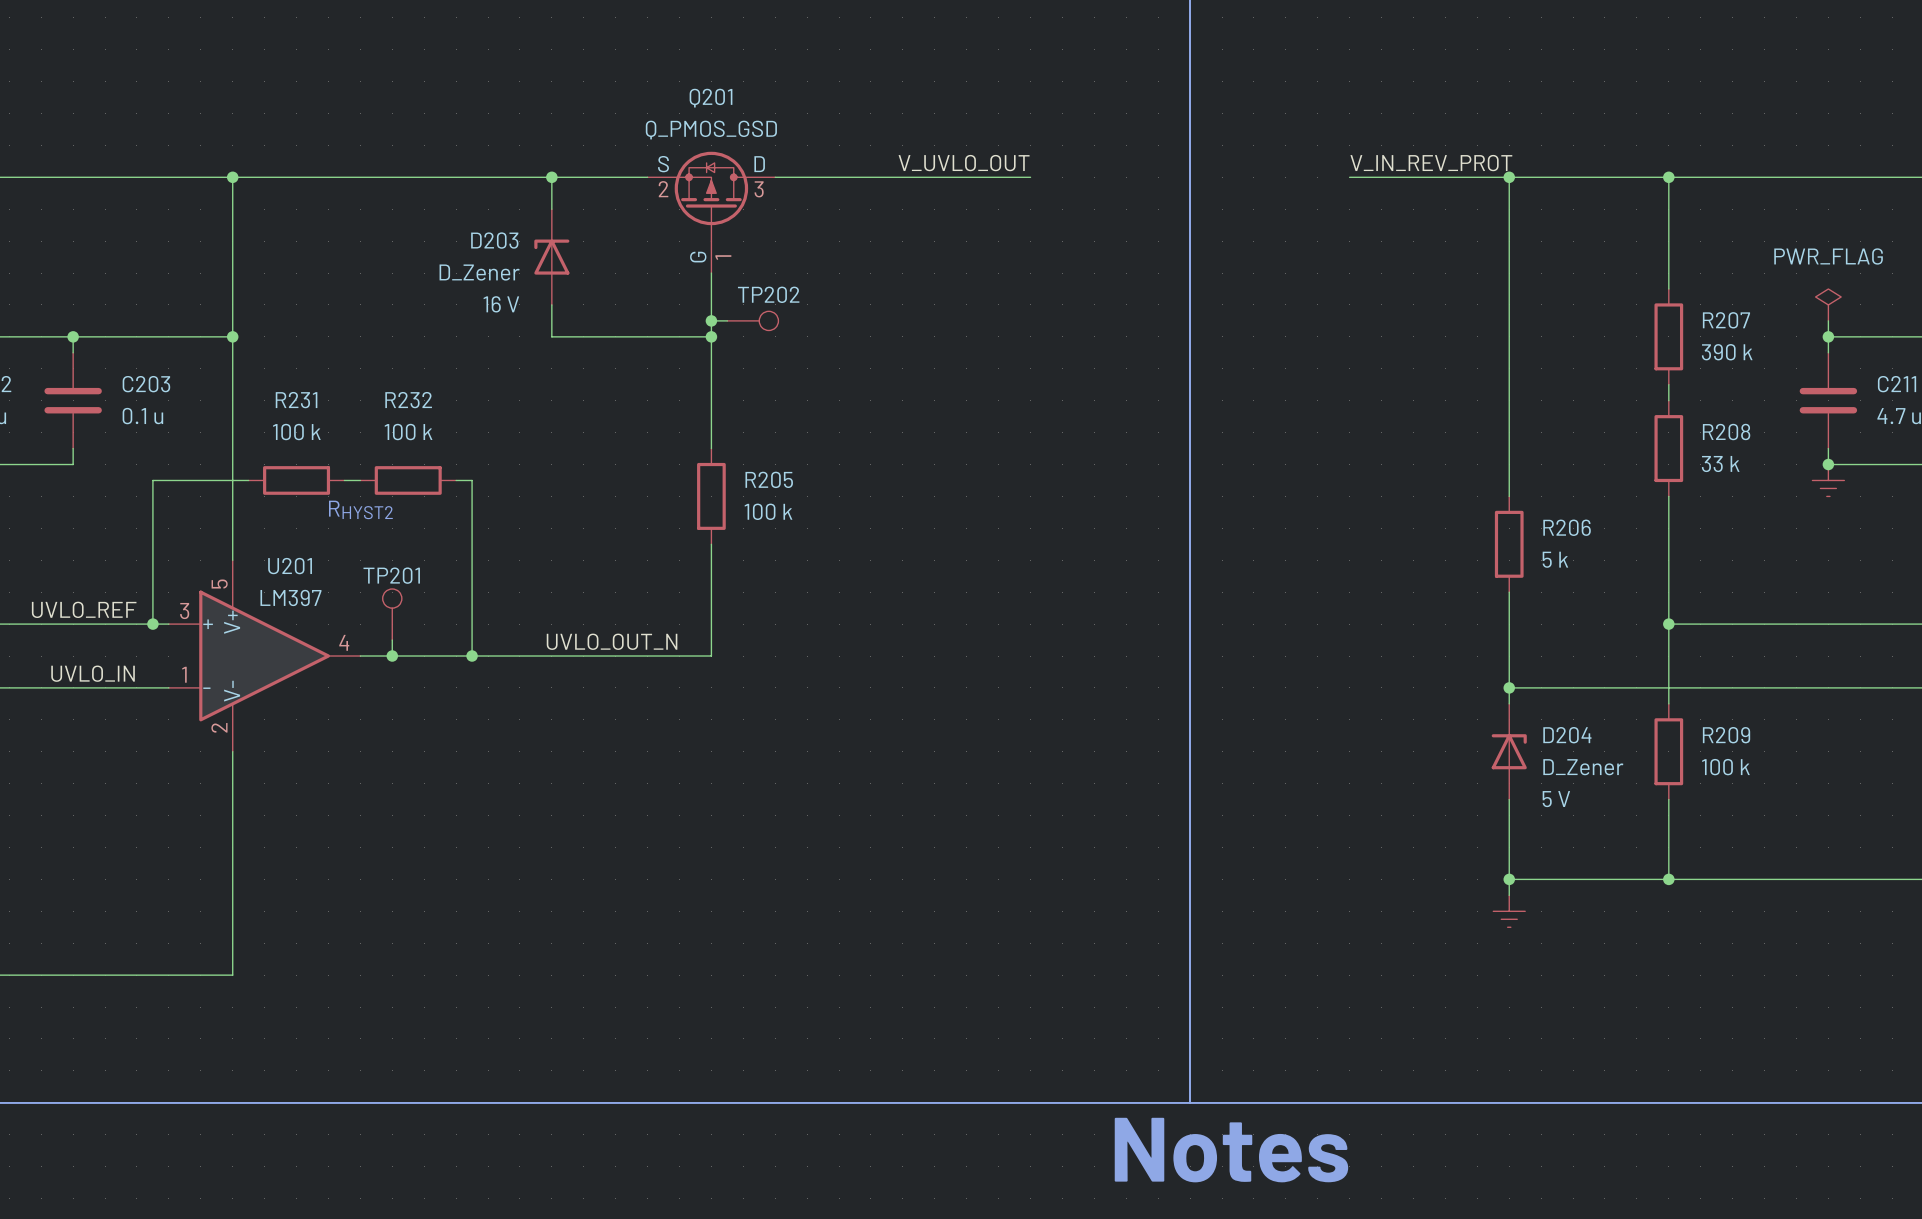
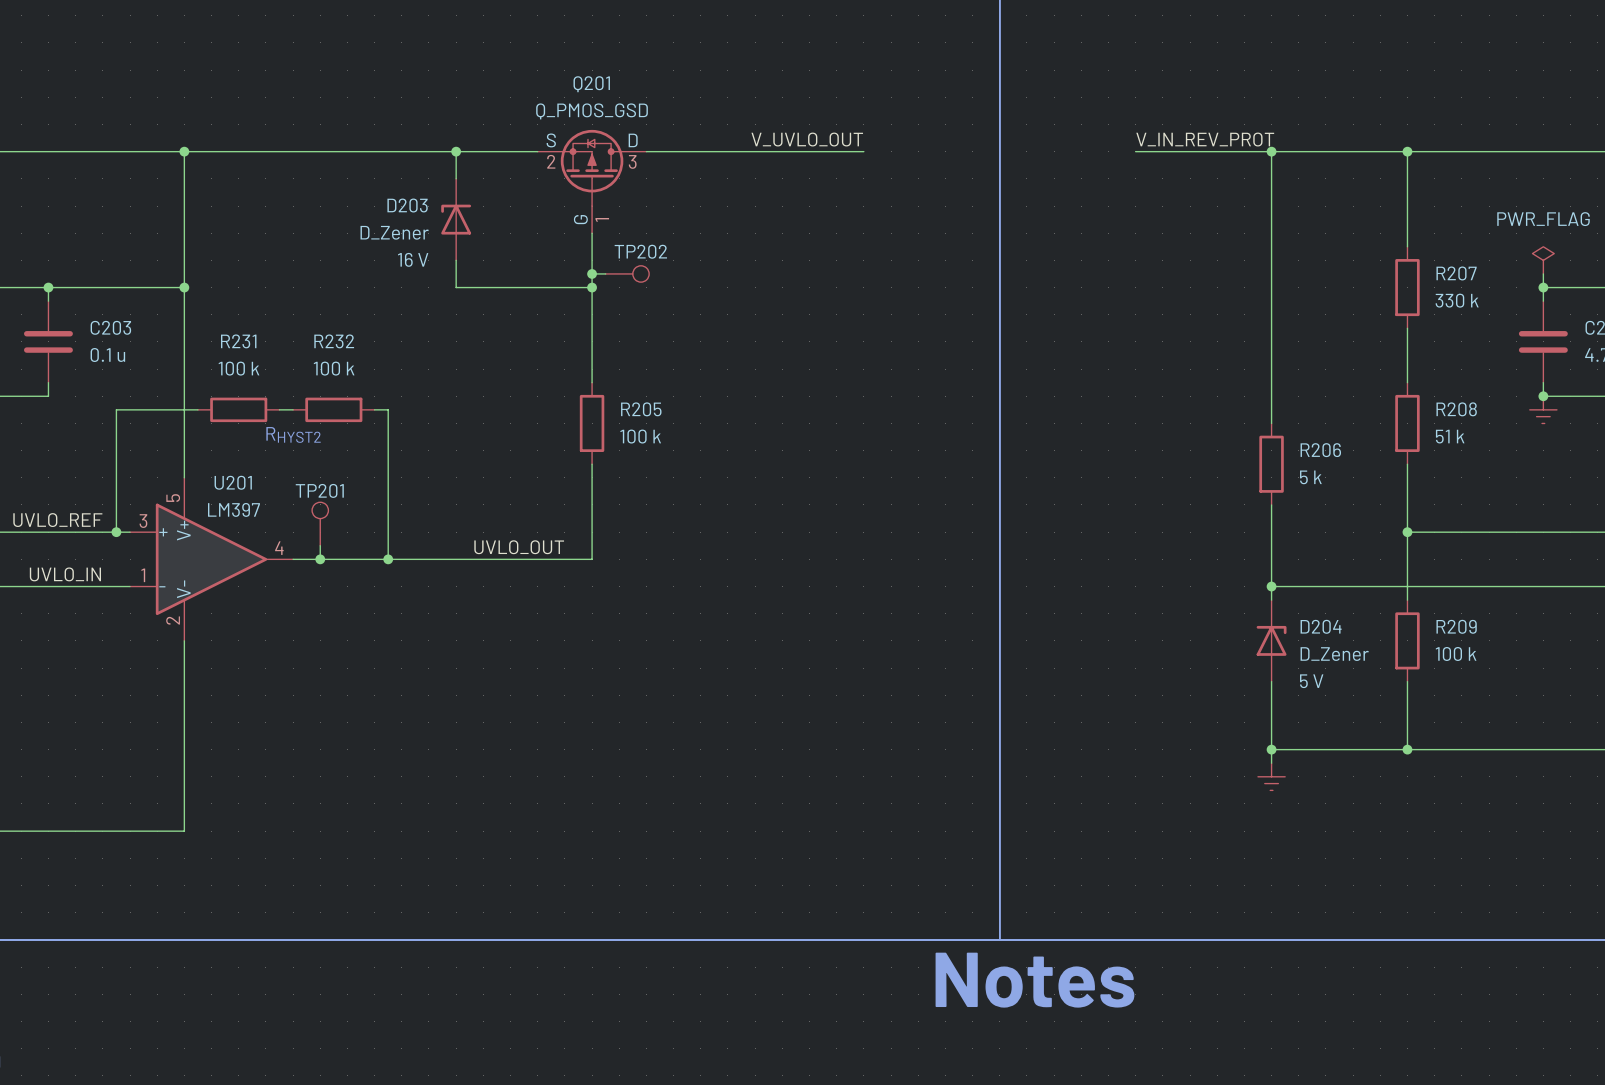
R207 value: 390 k (1727, 352) -> 330 k (1457, 300)
R208 position: (1668, 448) -> (1407, 423)
R208 value: 33 k (1720, 464) -> 51 k (1450, 436)
wire: (1668, 496) (1668, 544) -> (1407, 341) (1407, 382)
label: UVLO_OUT_N (612, 641) -> UVLO_OUT (519, 547)

